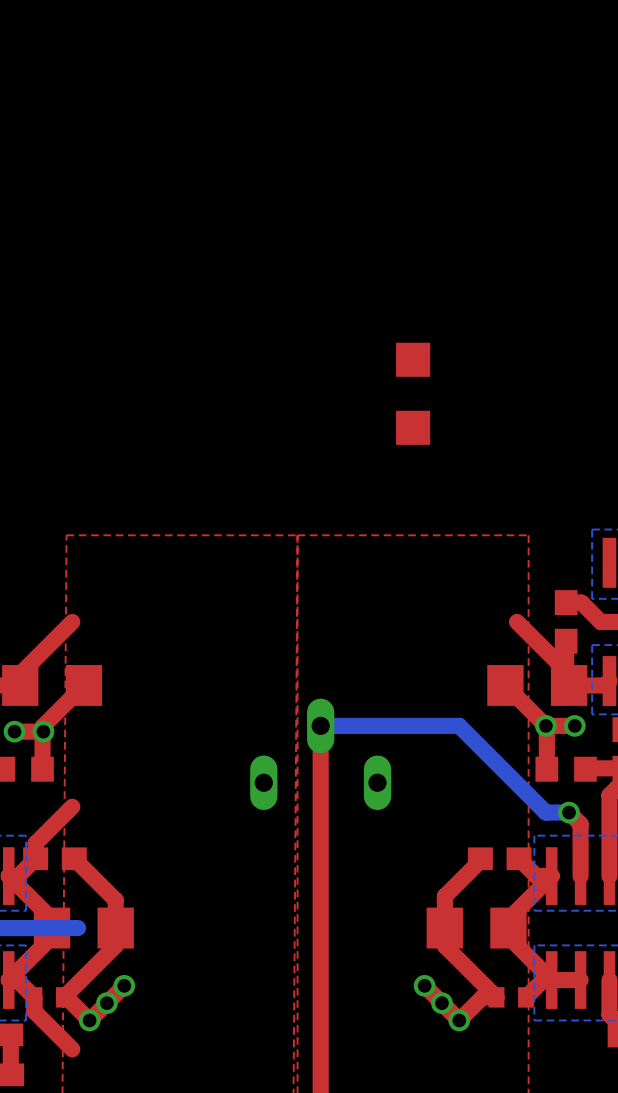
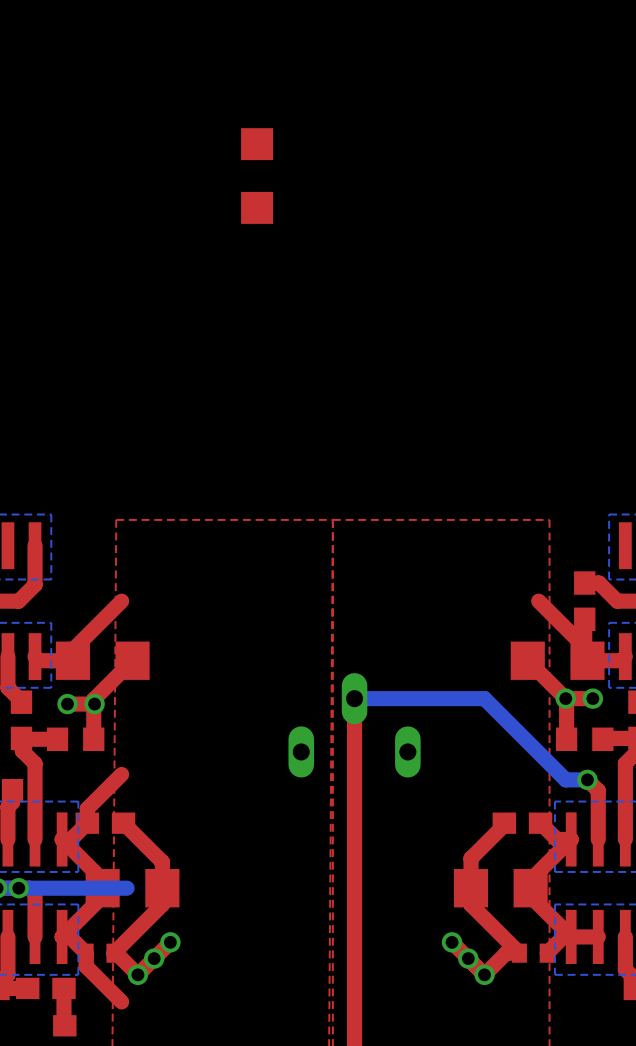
part position: (413, 393) -> (257, 176)

